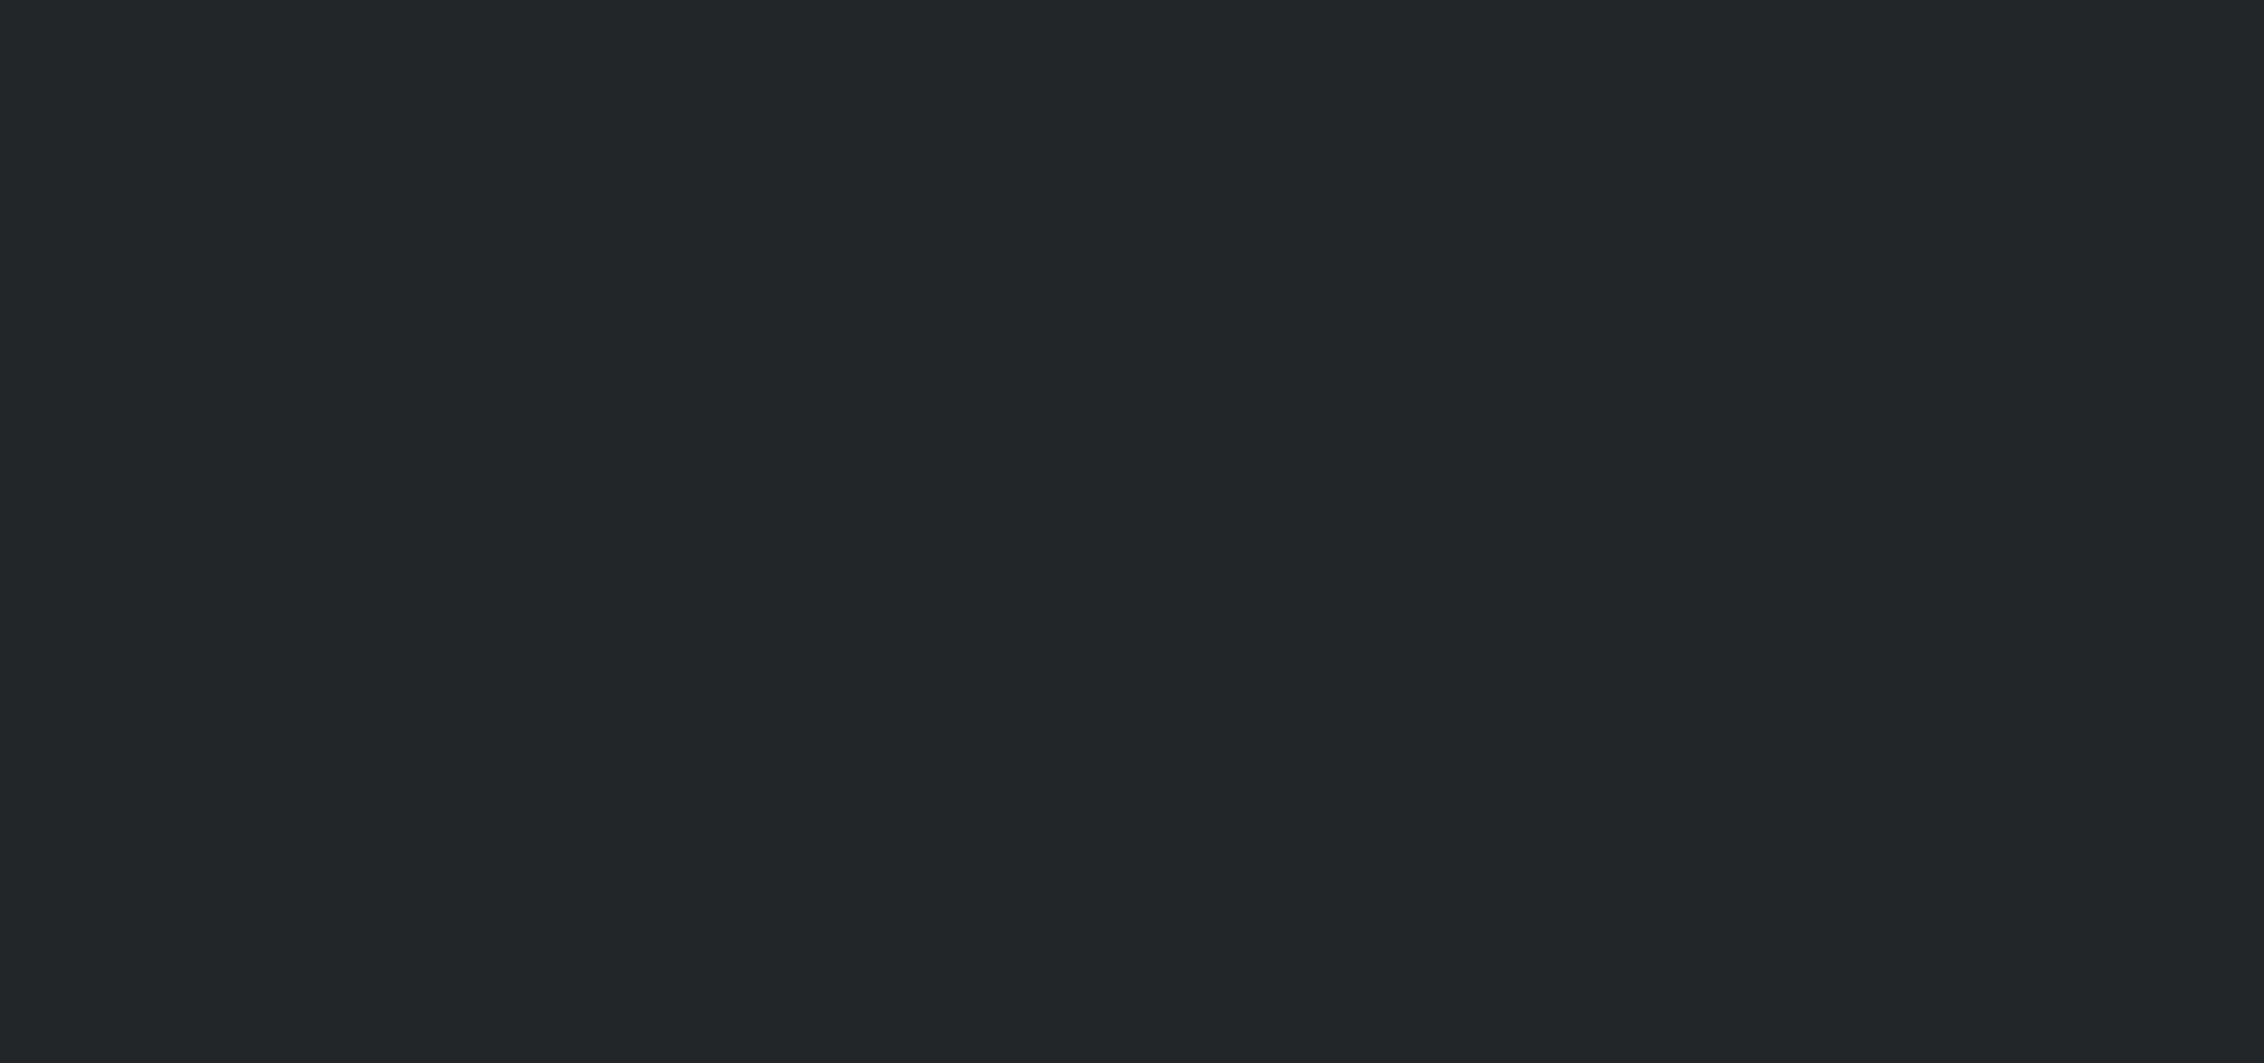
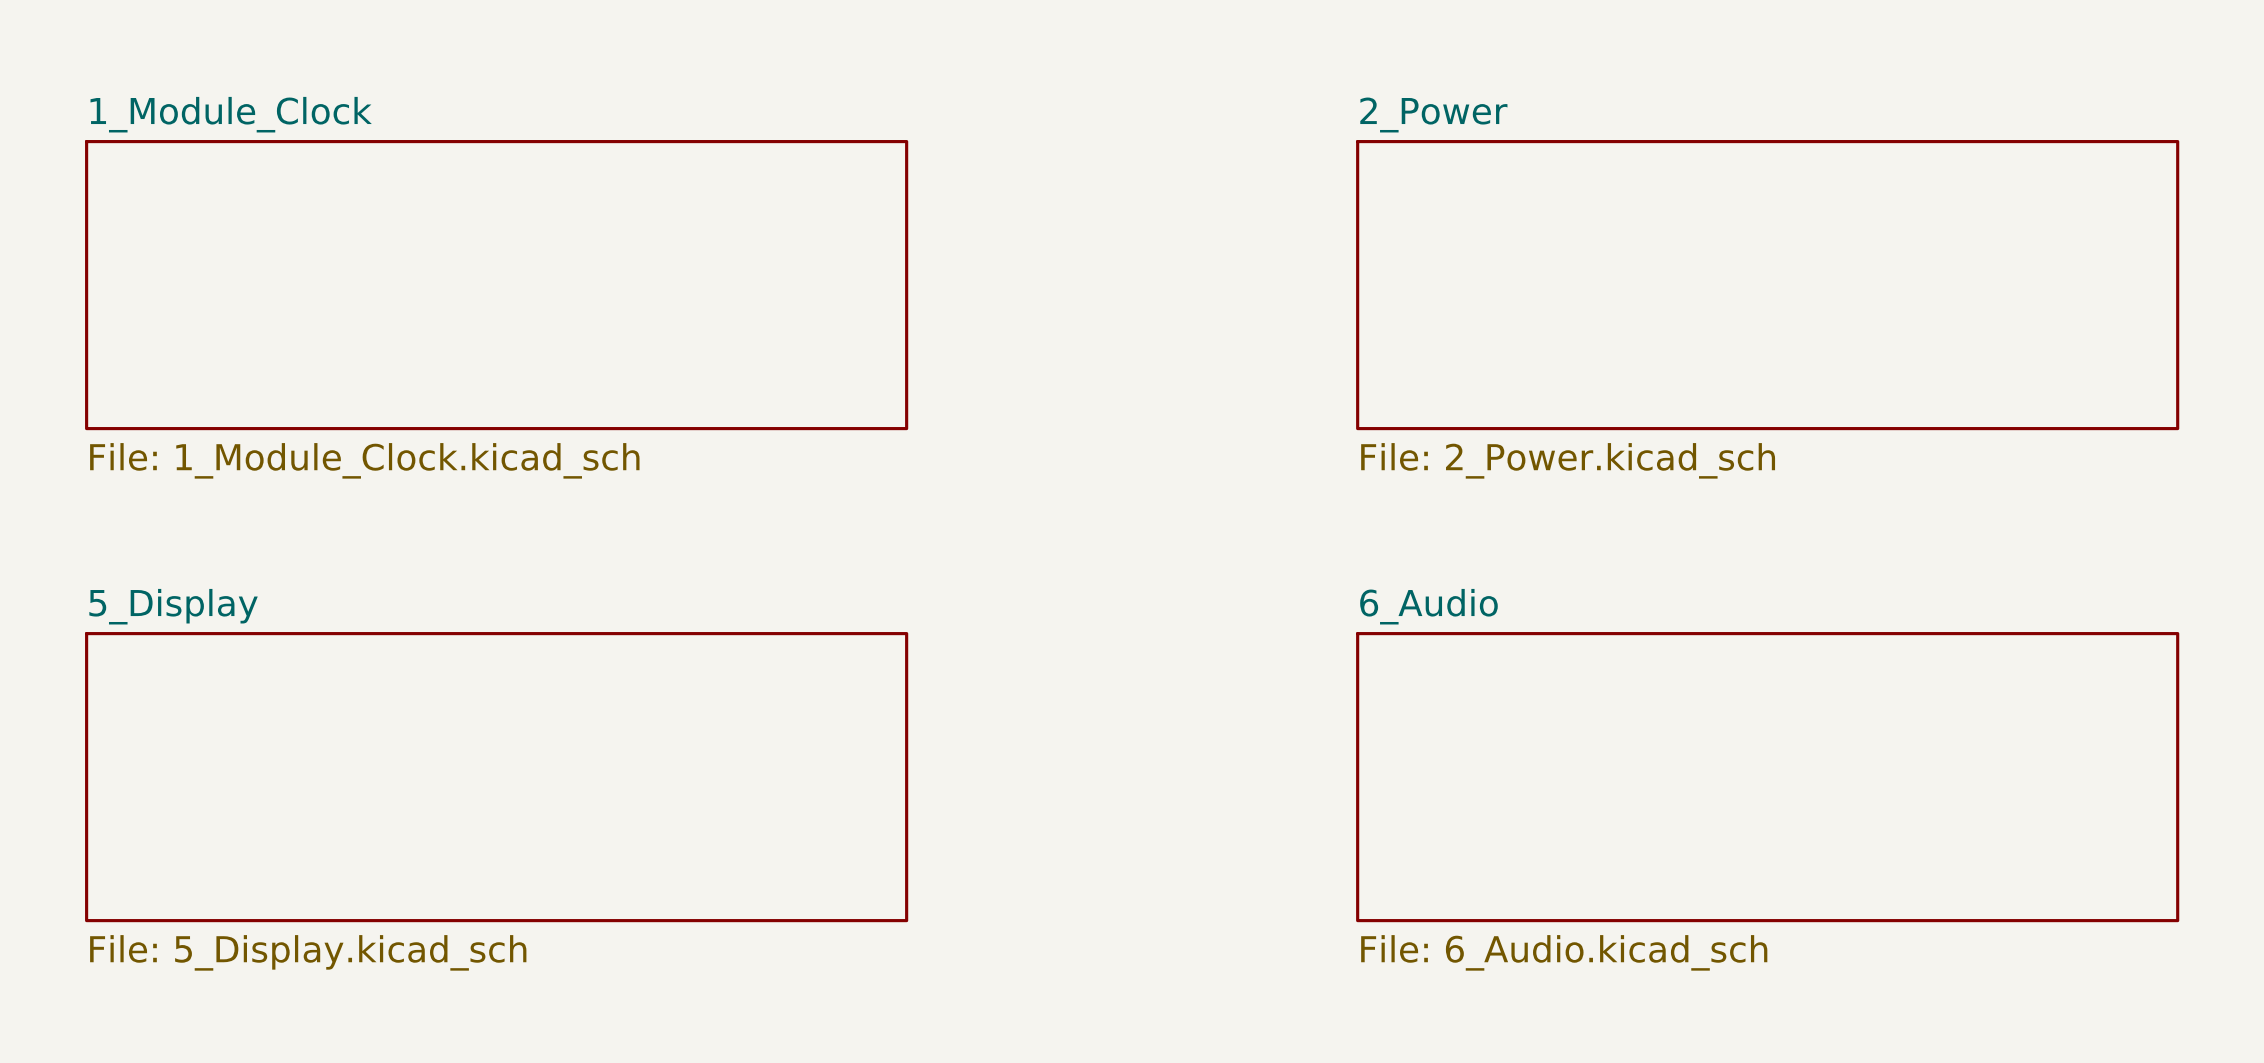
sheet 1_Module_Clock: none -> File: 1_Module_Clock.kicad_sch (496, 285)
sheet 2_Power: none -> File: 2_Power.kicad_sch (1767, 285)
sheet 5_Display: none -> File: 5_Display.kicad_sch (496, 777)
sheet 6_Audio: none -> File: 6_Audio.kicad_sch (1767, 777)

